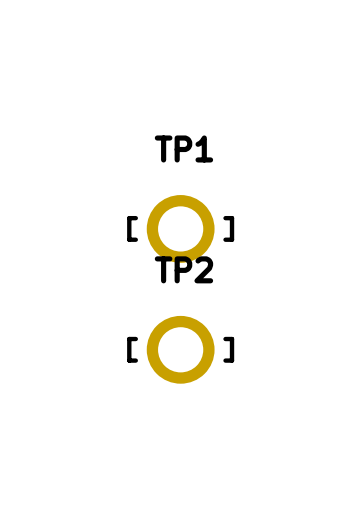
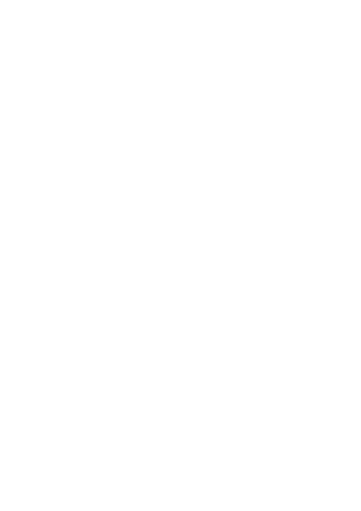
TP1: (180, 228) -> none
TP2: (180, 349) -> none

